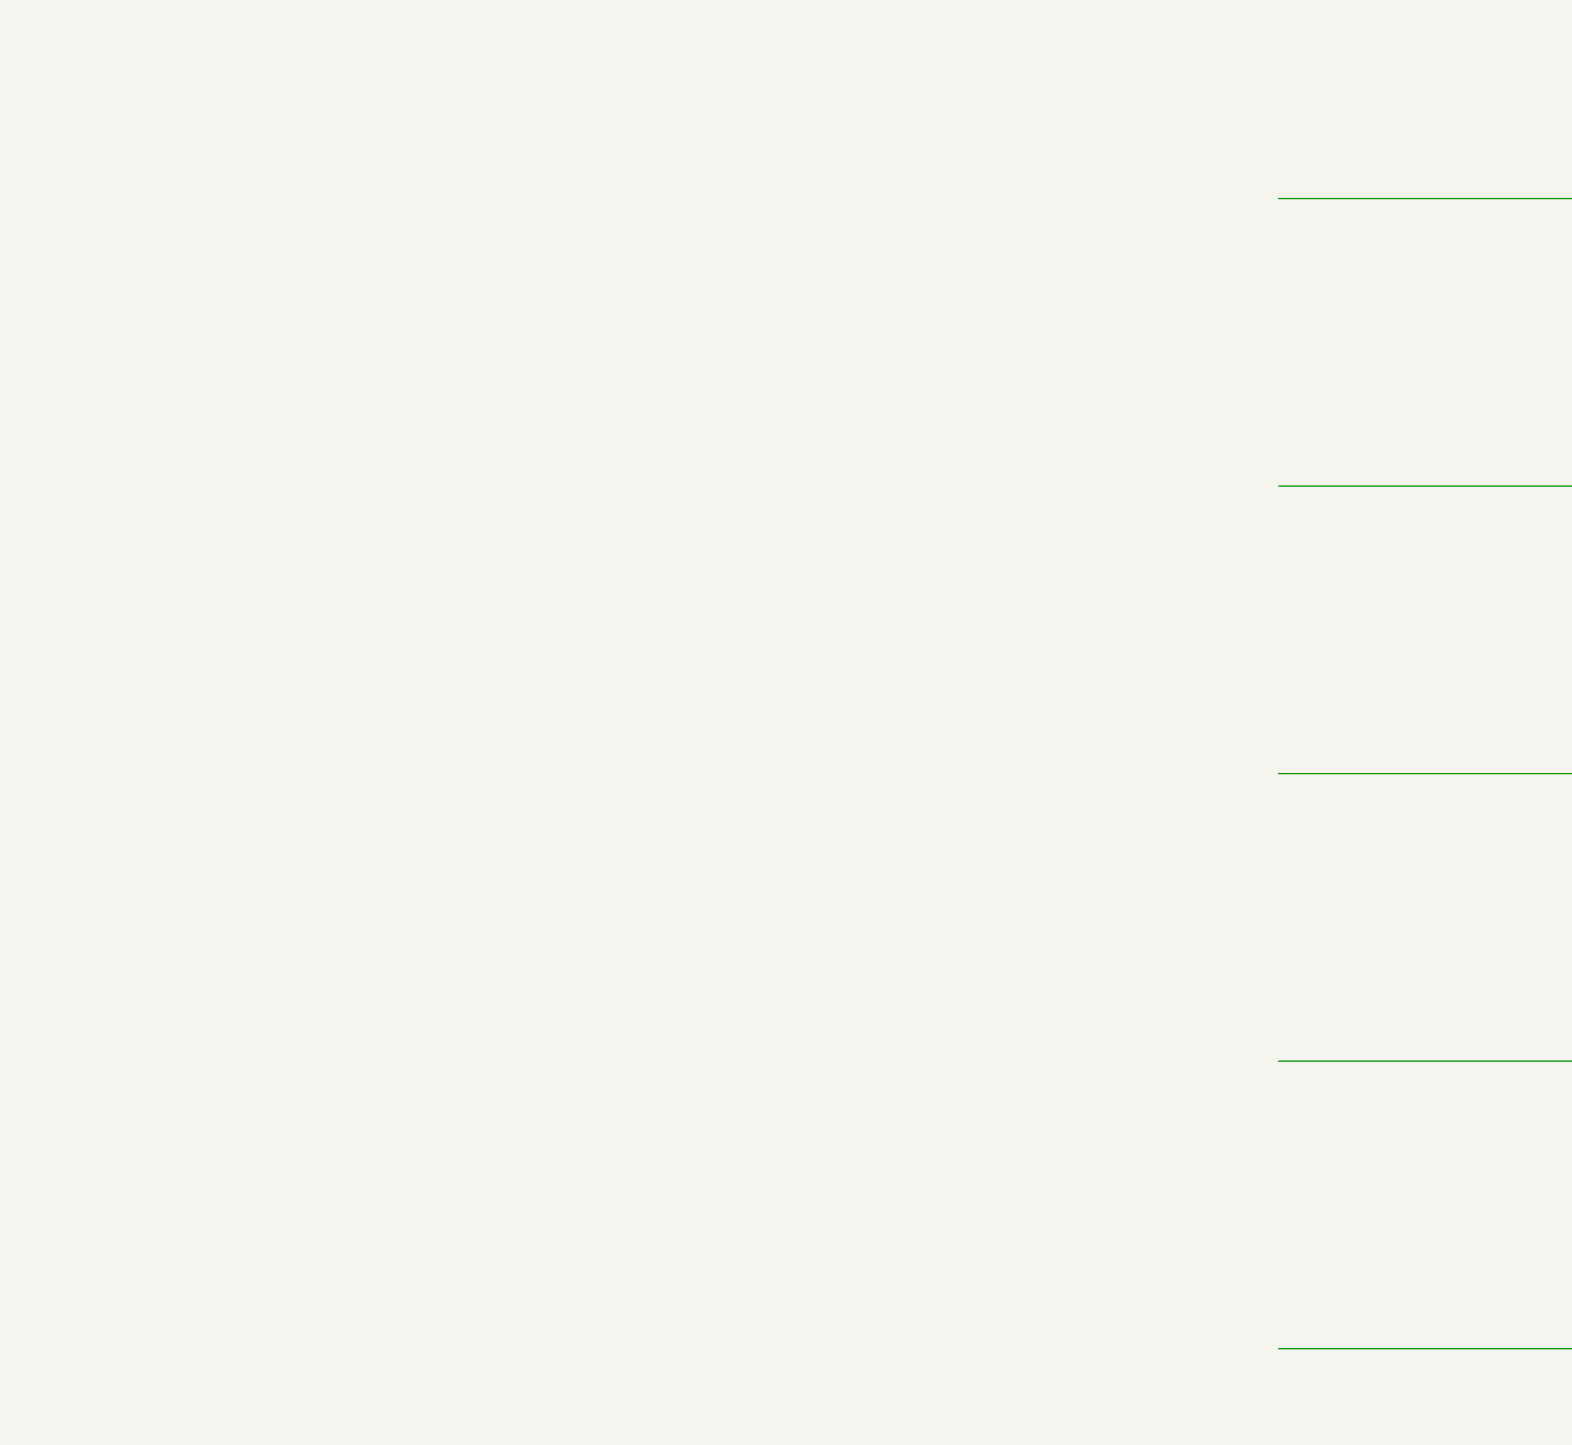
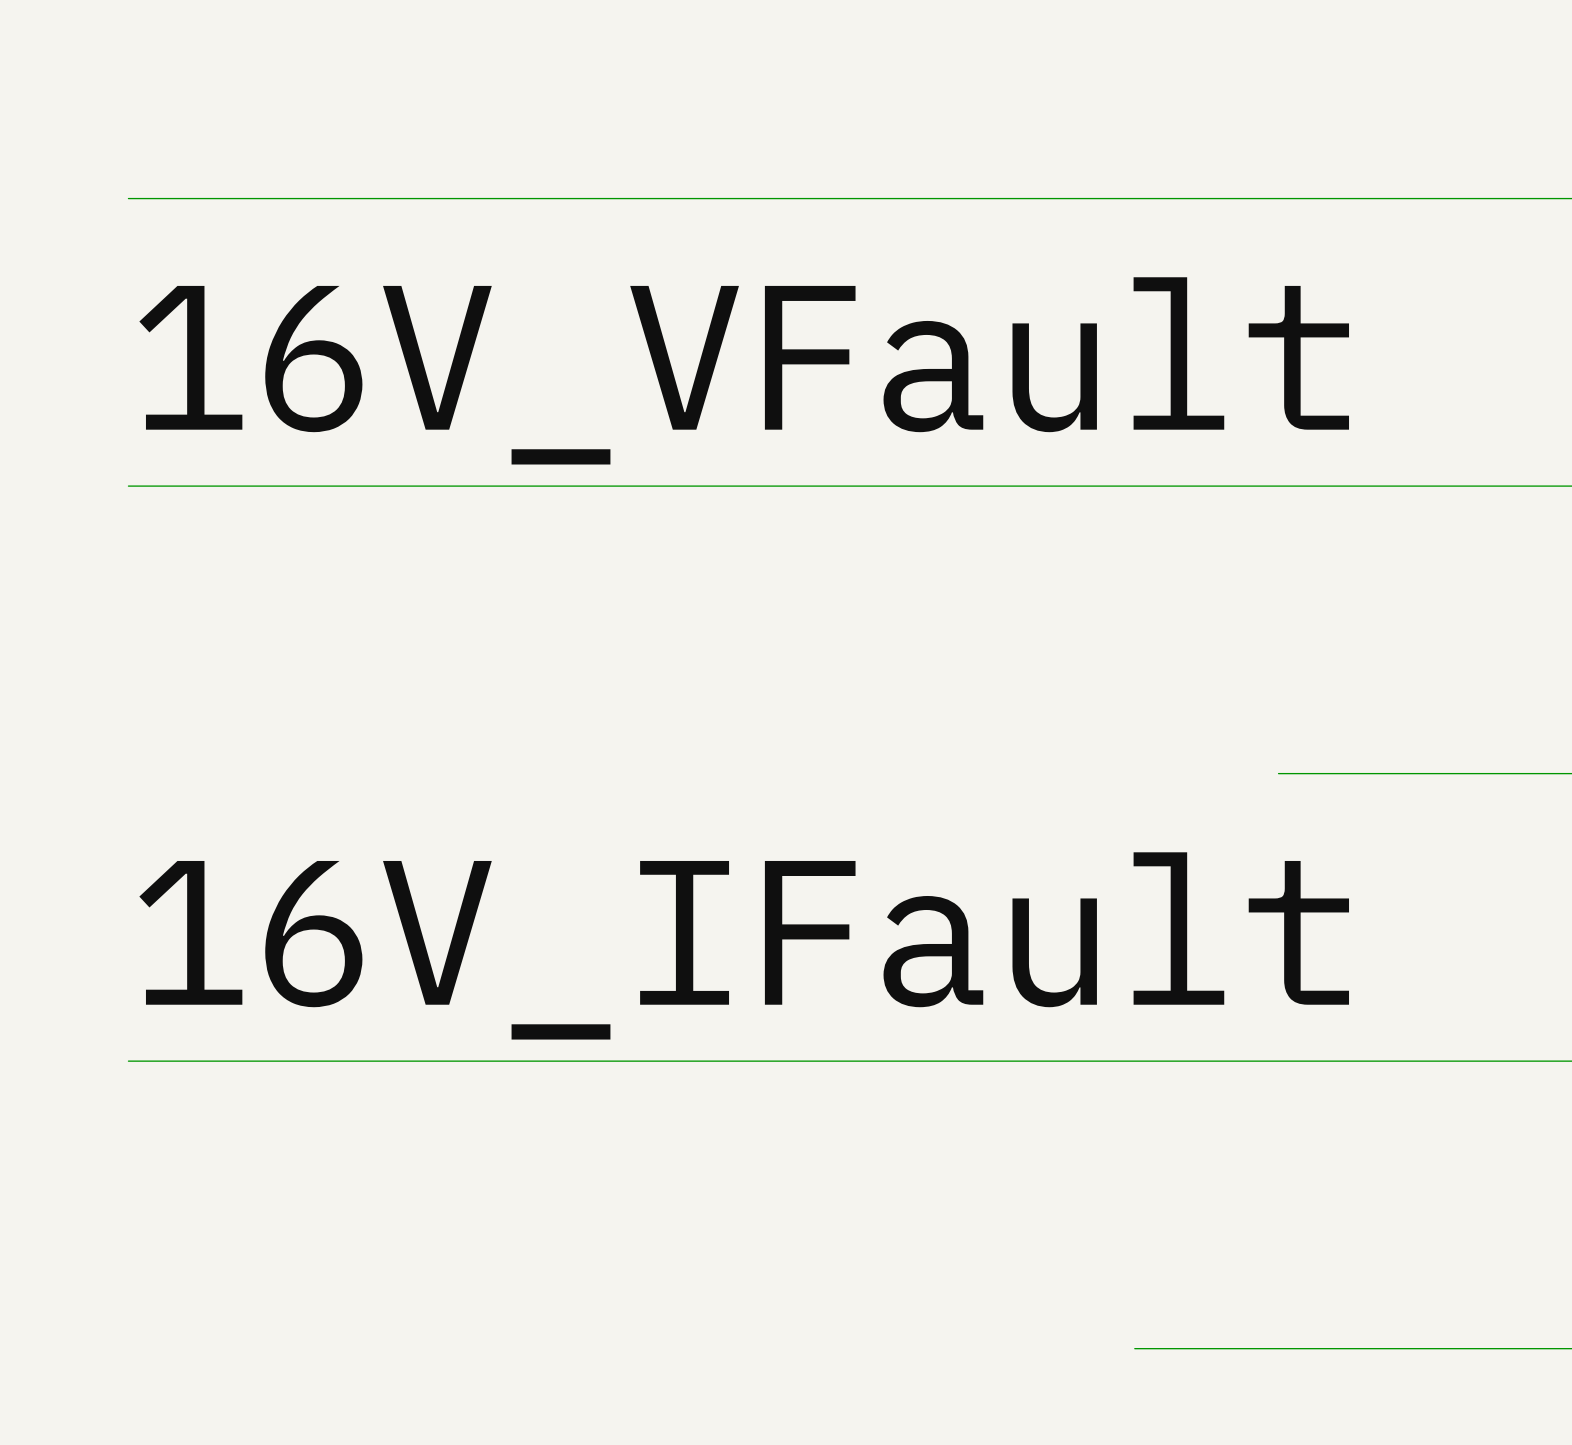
wire: none -> (128, 198) (1278, 198)
label: none -> 16V_VFault (744, 370)
wire: none -> (128, 486) (1278, 486)
label: none -> 16V_IFault (744, 945)
wire: none -> (128, 1061) (1278, 1061)
wire: none -> (1134, 1348) (1278, 1348)

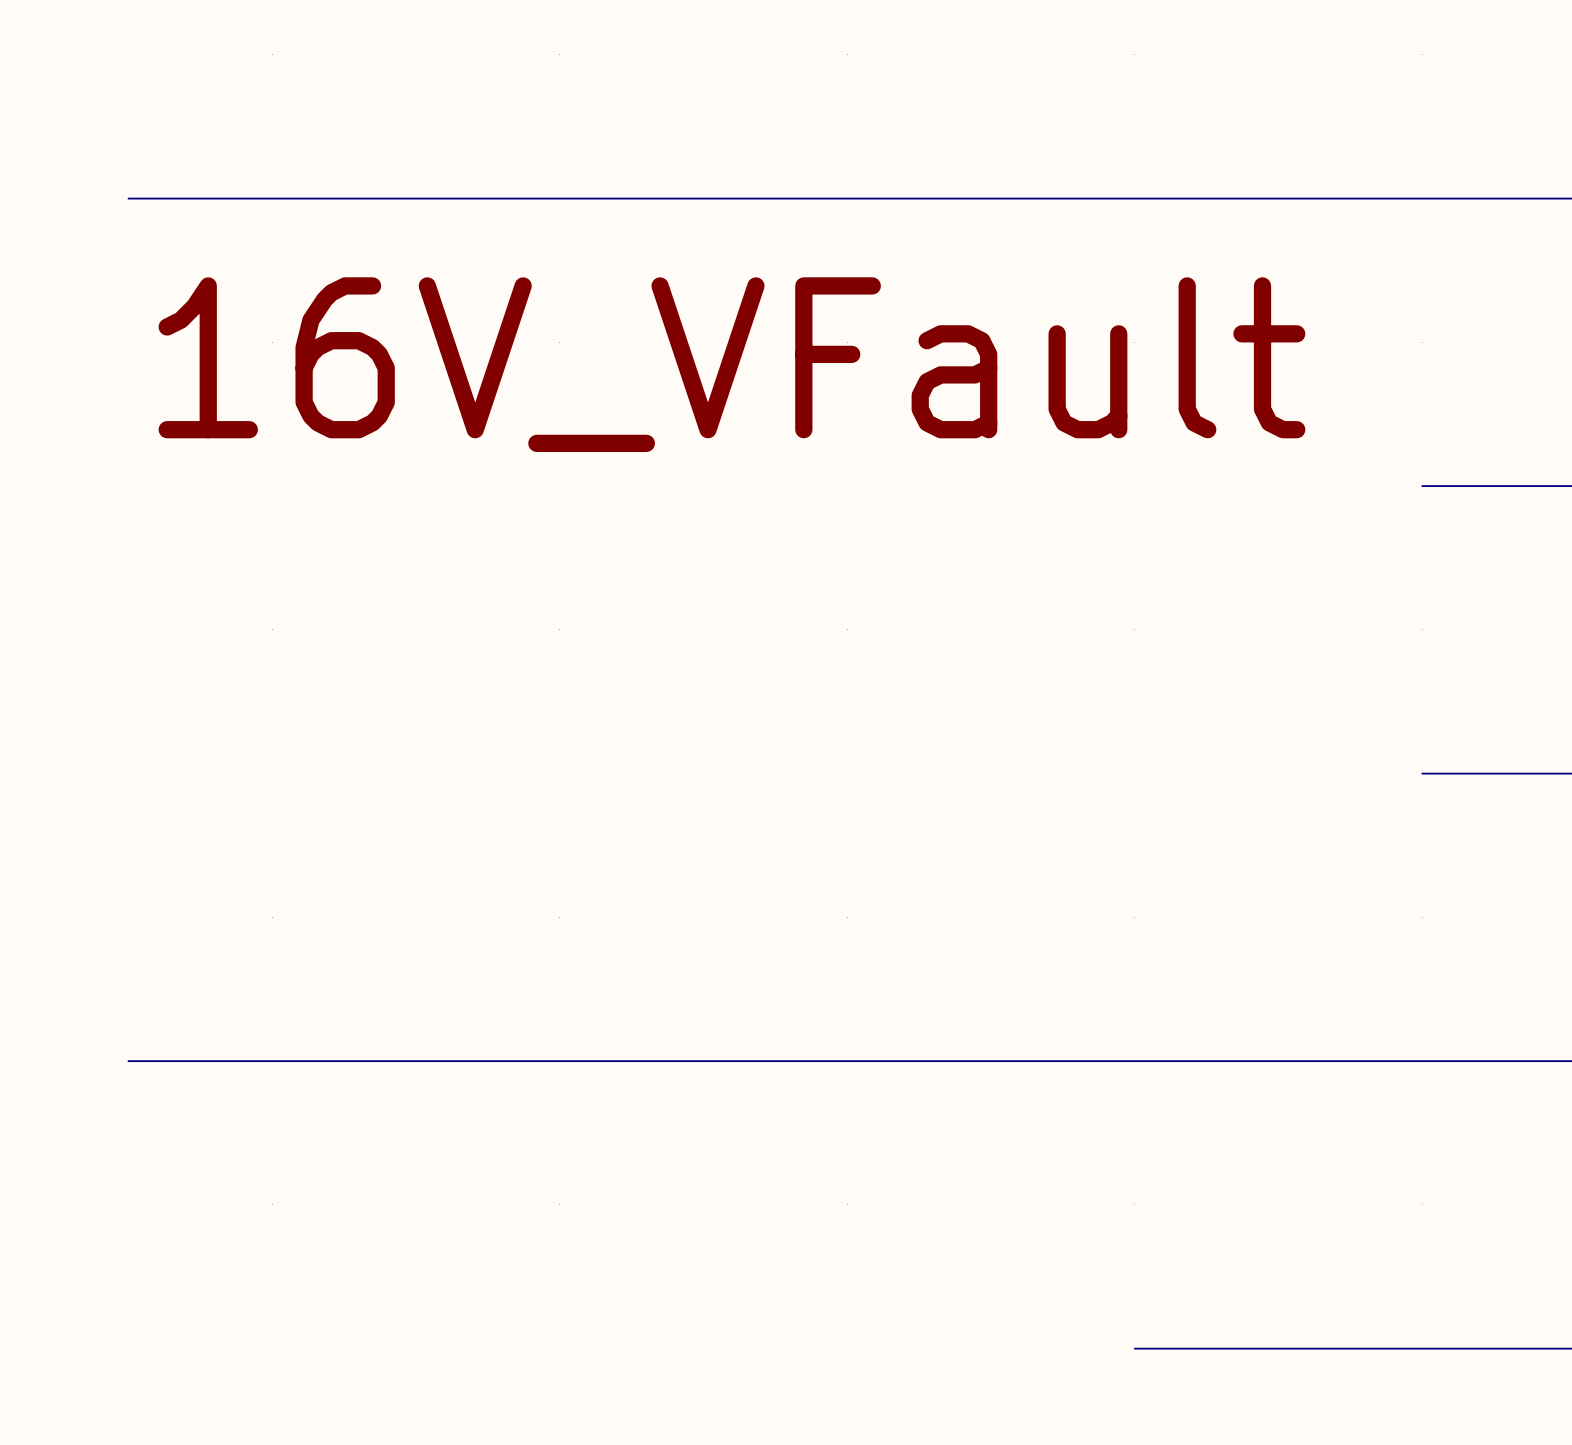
wire: (128, 486) (1422, 486) -> none
wire: (1278, 773) (1422, 773) -> none
label: 16V_IFault (744, 945) -> none

